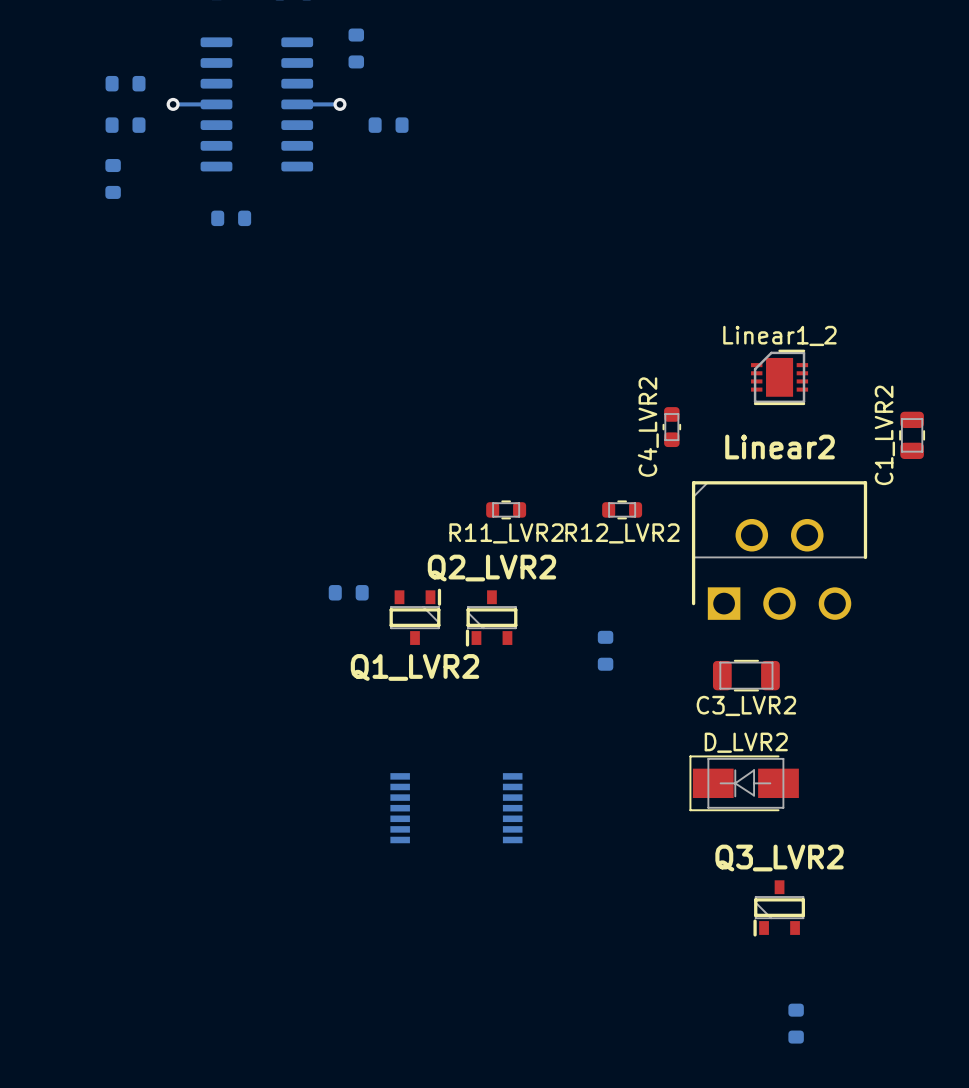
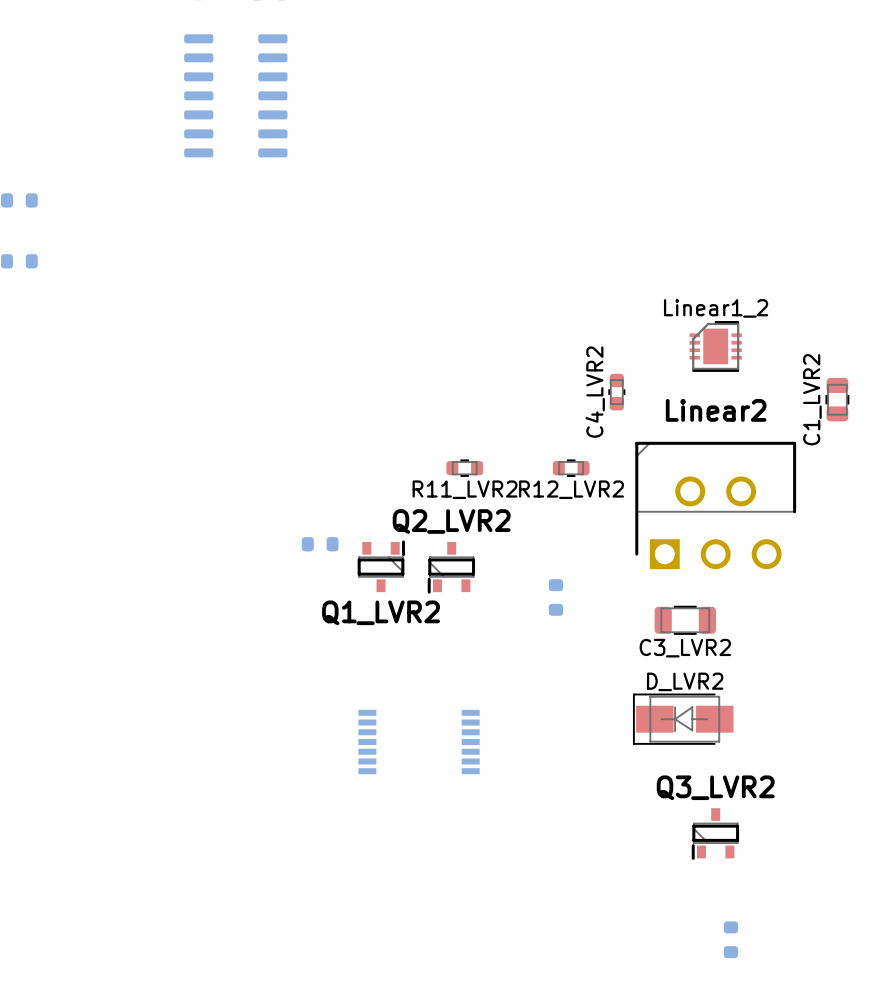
part: (356, 48) -> none
part: (125, 83) -> none
bottom track: (173, 104) (216, 104) -> none
via: (173, 104) -> none
bottom track: (296, 104) (339, 104) -> none
via: (339, 104) -> none
part: (125, 125) -> none
part: (388, 125) -> none
part: (113, 178) -> none
part: none -> (19, 200)
part: (231, 218) -> none
part: none -> (19, 261)

